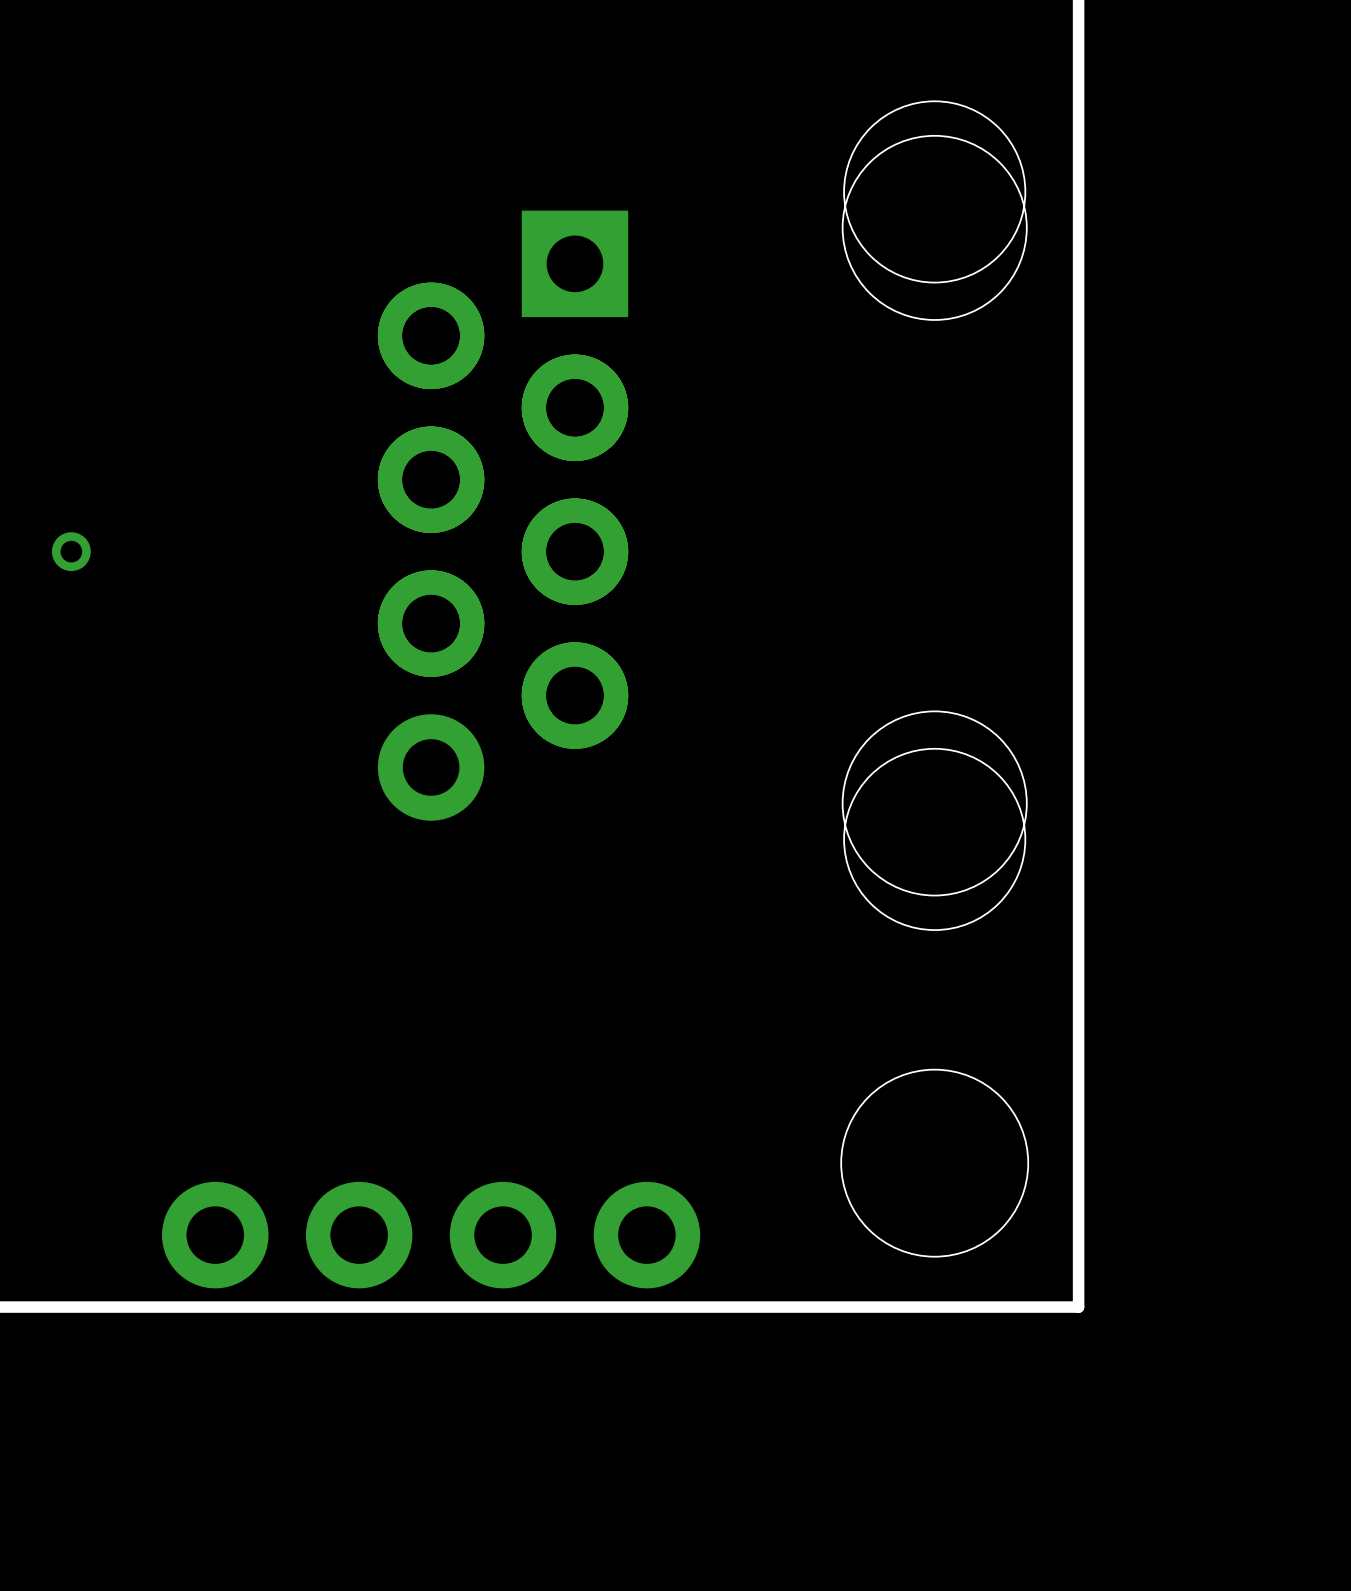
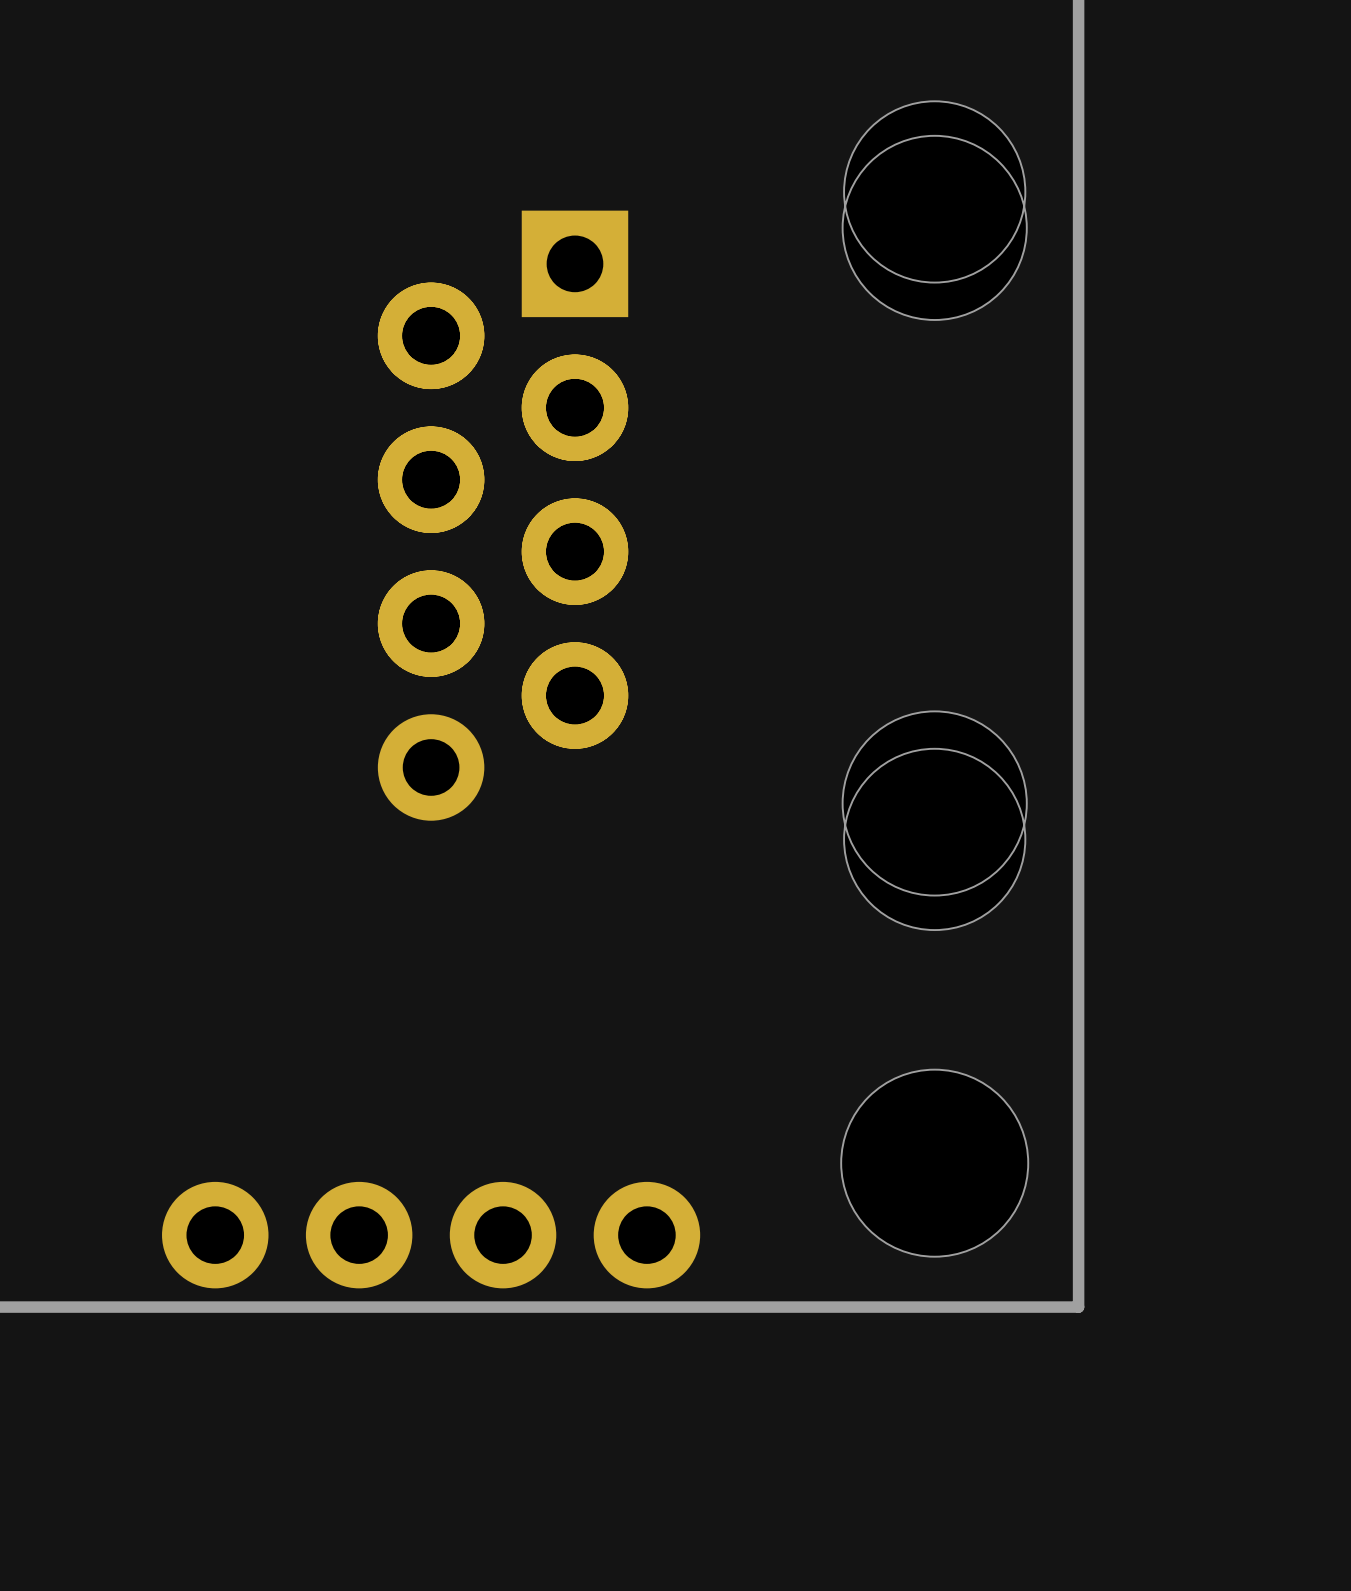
via: (71, 551) -> none

